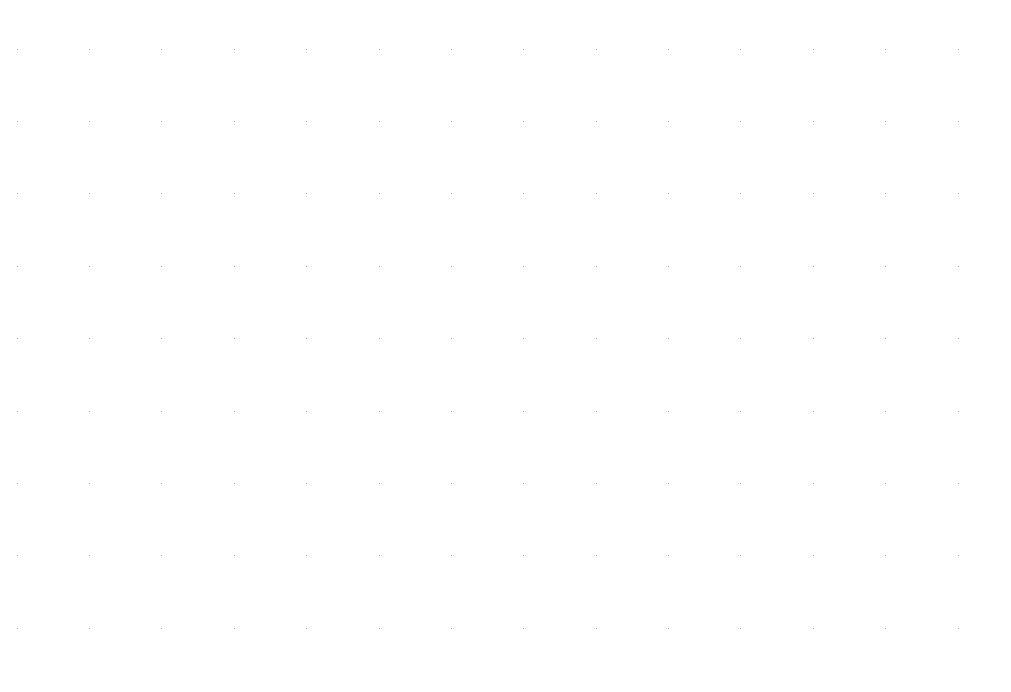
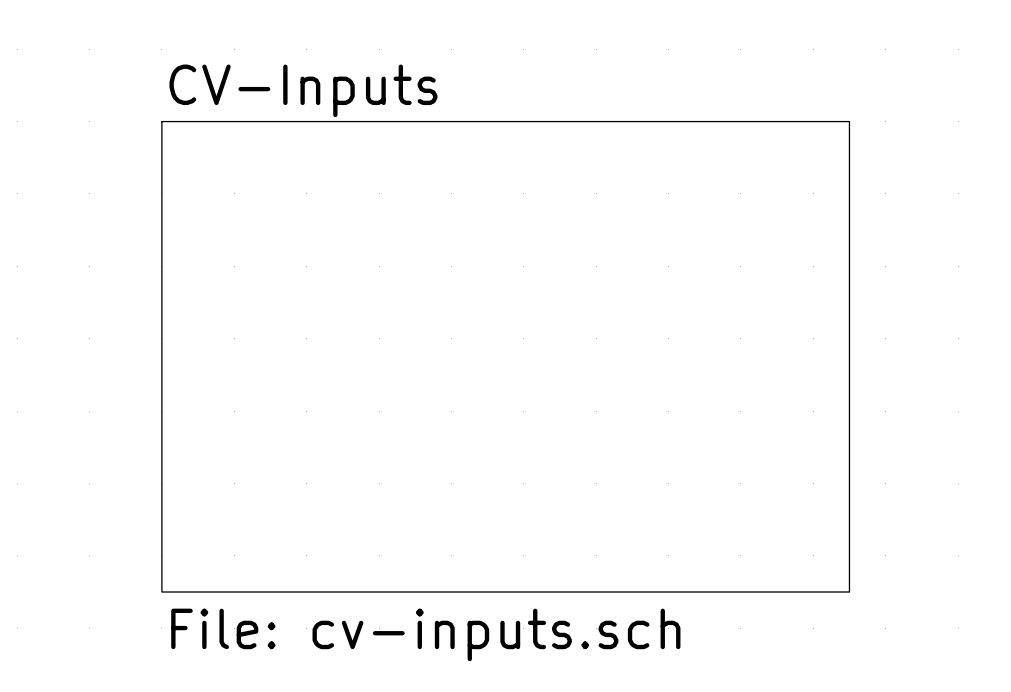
sheet CV-Inputs: none -> File: cv-inputs.sch (505, 356)

